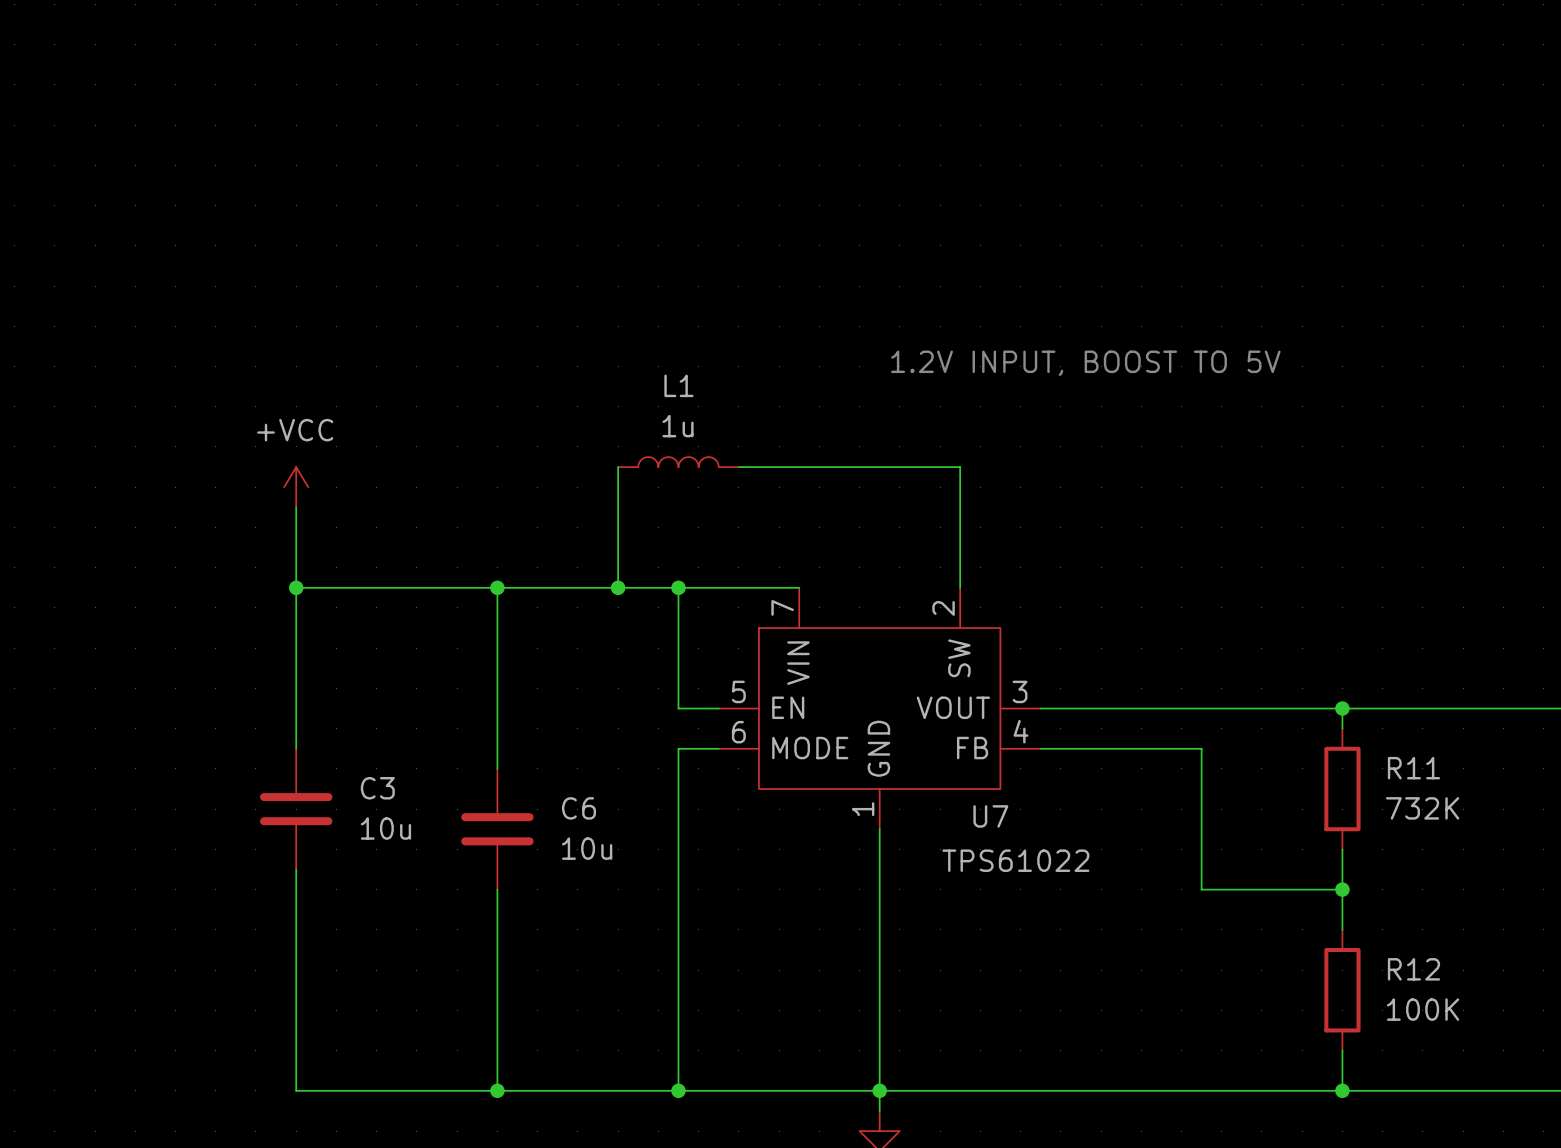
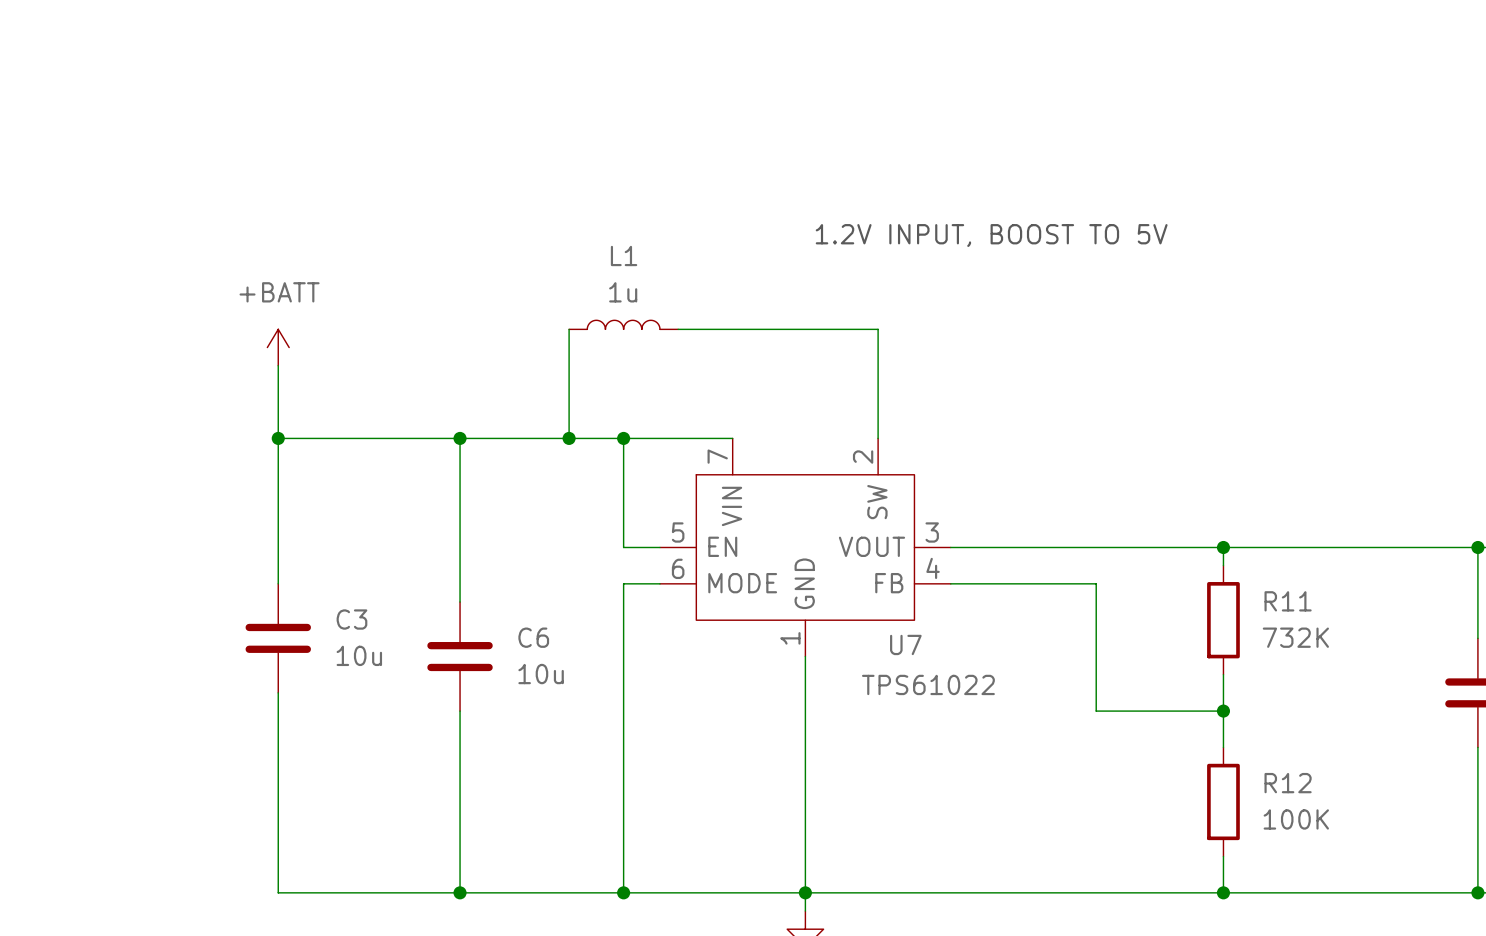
power symbol: +VCC (296, 487) -> +BATT (278, 347)

